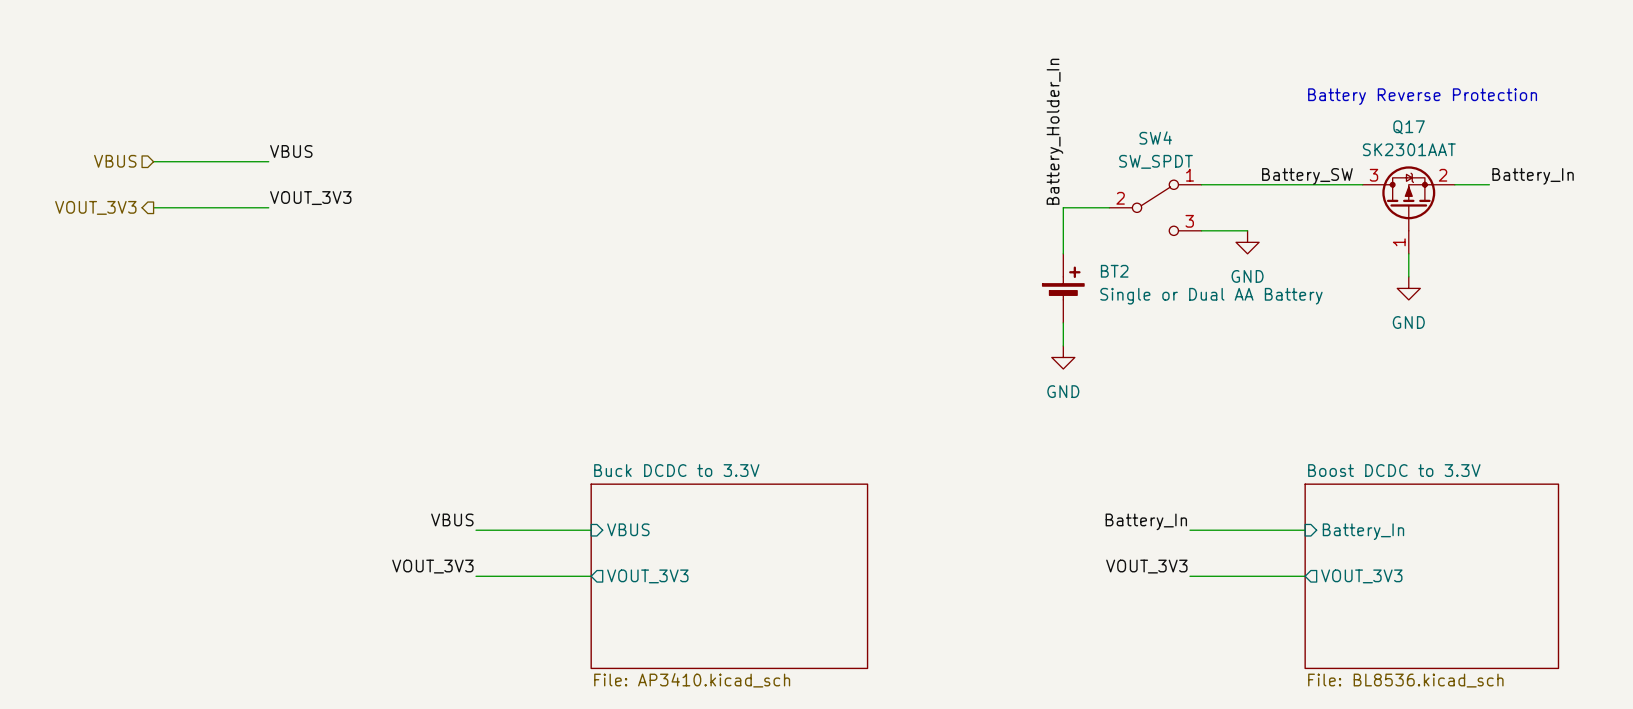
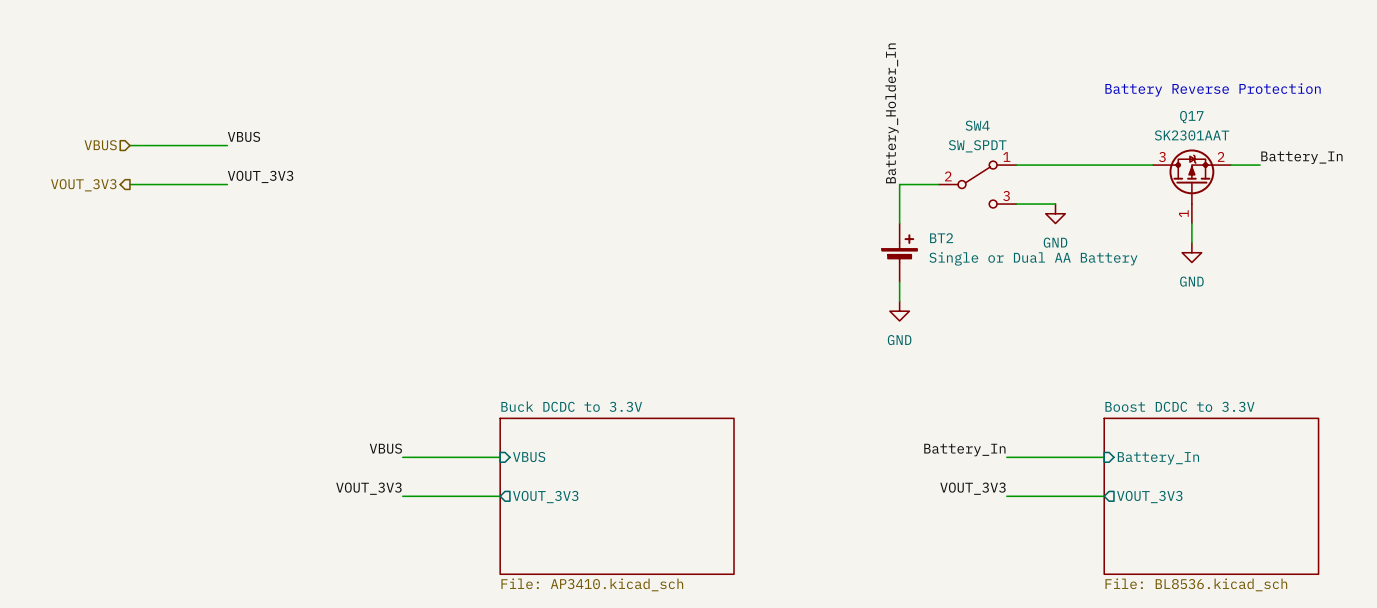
label: Battery_SW (1307, 176) -> none

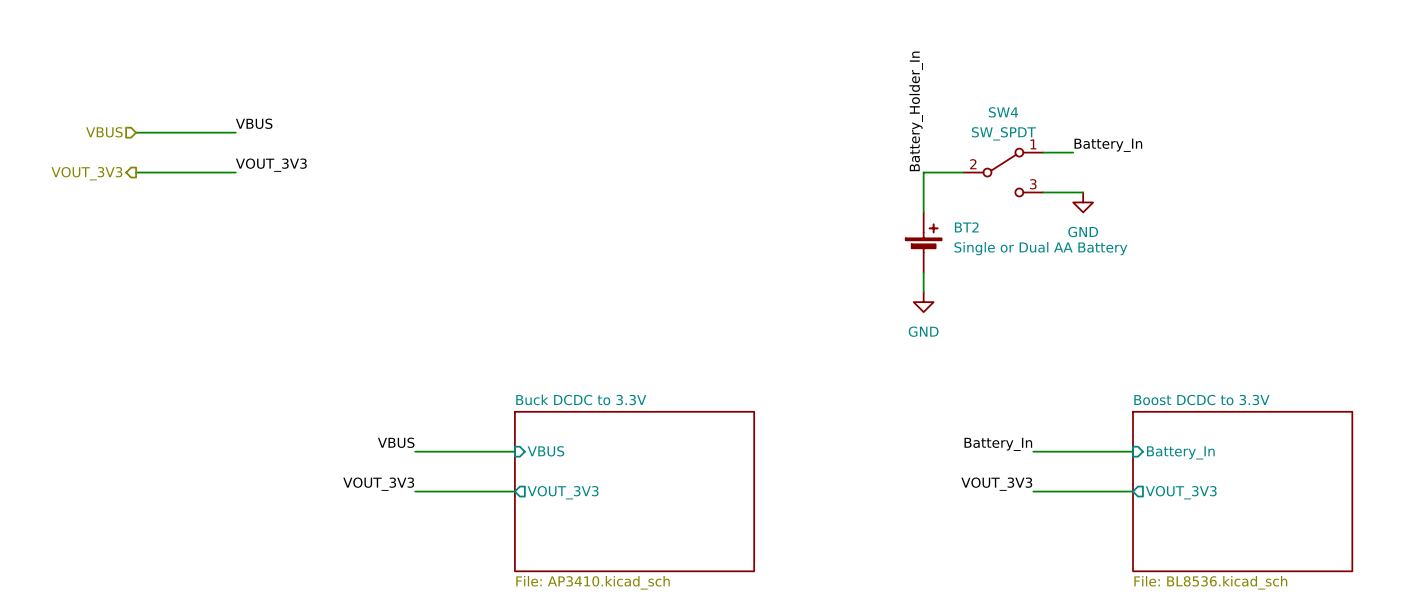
text: Battery Reverse Protection (1213, 89) -> none
label: none -> Battery_In (1108, 145)
label: Battery_In (1301, 157) -> none
wire: (1045, 165) (1152, 165) -> none
wire: (1230, 165) (1260, 165) -> none
Q17: SK2301AAT (1191, 186) -> none
wire: (1191, 223) (1191, 243) -> none
power symbol: GND (1191, 252) -> none

